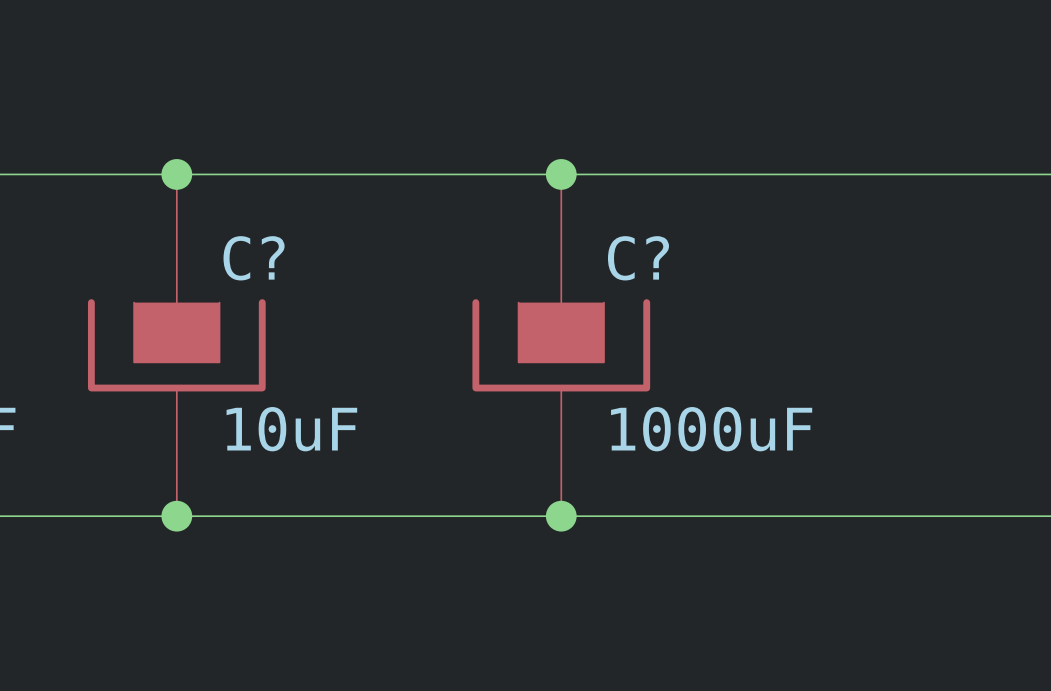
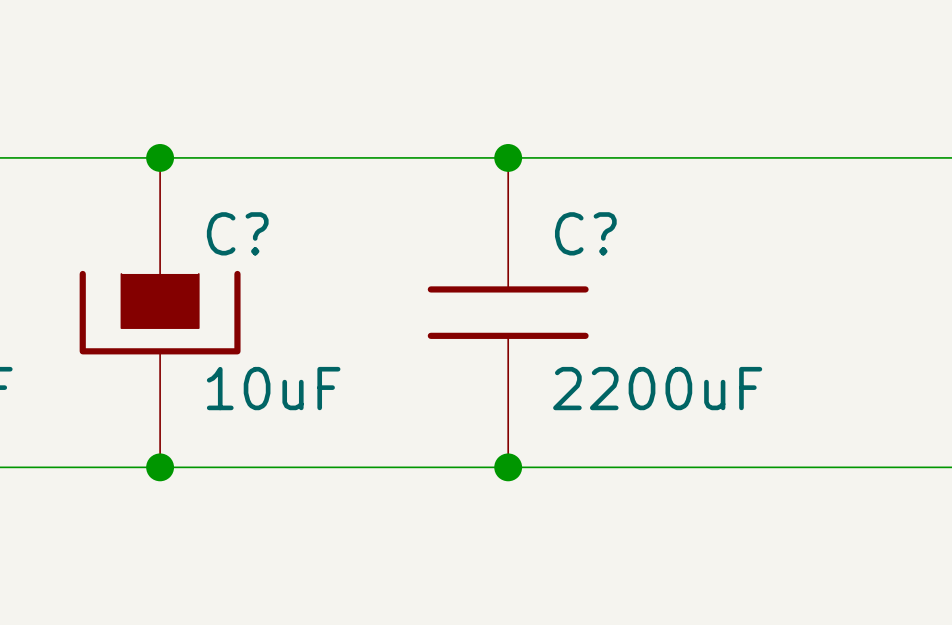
C? symbol: [472, 174, 651, 517] -> [427, 157, 589, 468]
C? value: 1000uF (711, 429) -> 2200uF (657, 388)

